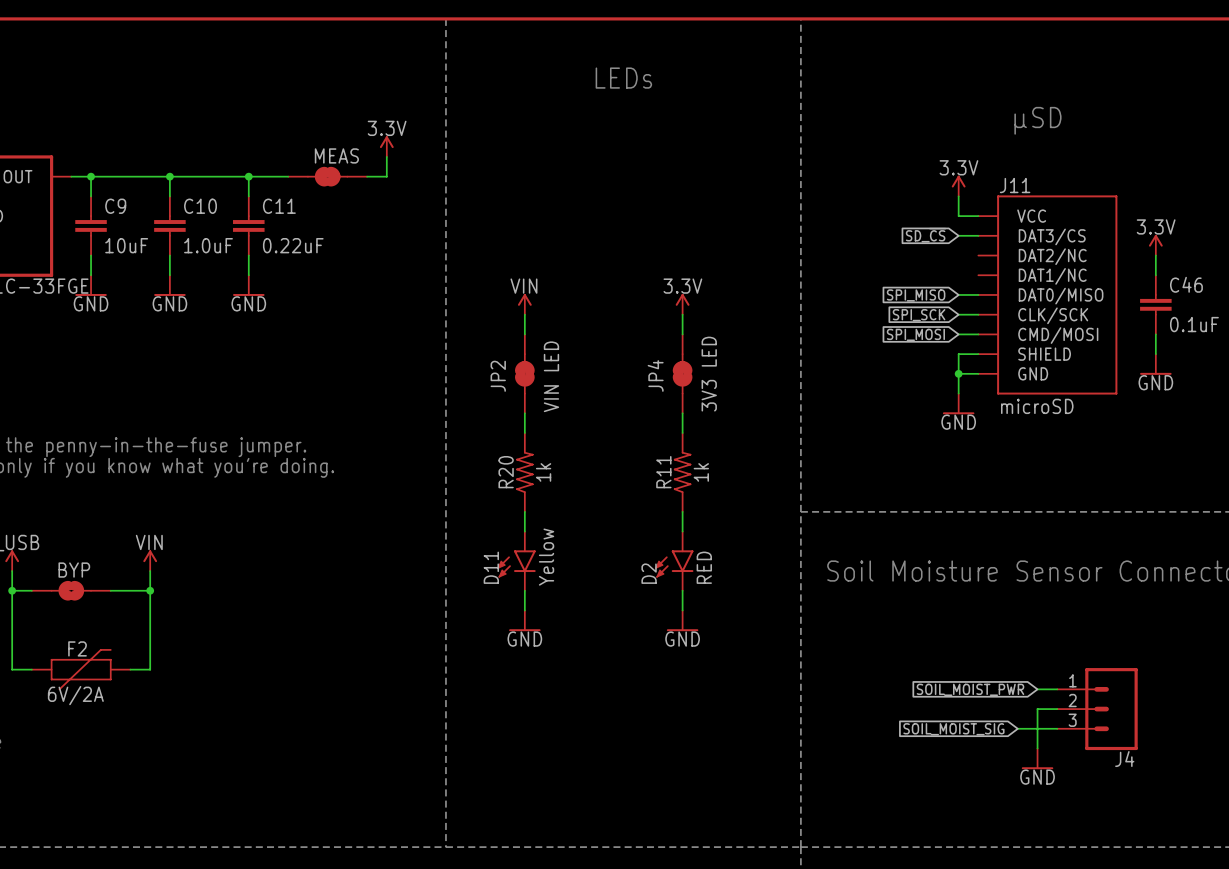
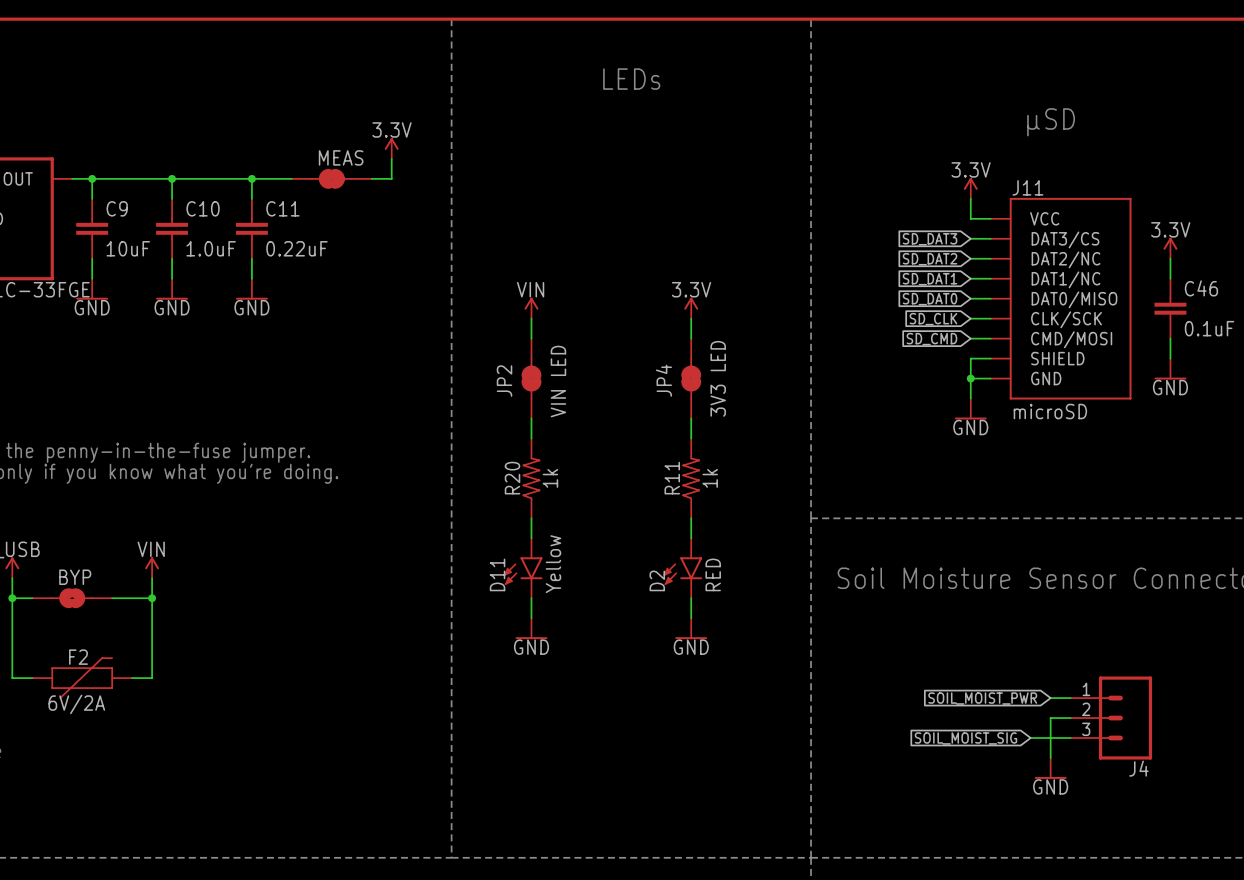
global label: SD_~{CS} (926, 235) -> SD_DAT3 (930, 239)
wire: none -> (970, 258) (990, 258)
global label: none -> SD_DAT2 (930, 259)
global label: none -> SD_DAT1 (930, 279)
wire: none -> (970, 278) (990, 278)
global label: SPI_MISO (916, 295) -> SD_DAT0 (930, 299)
global label: SPI_SCK (919, 315) -> SD_CLK (933, 319)
global label: SPI_MOSI (915, 334) -> SD_CMD (931, 339)

